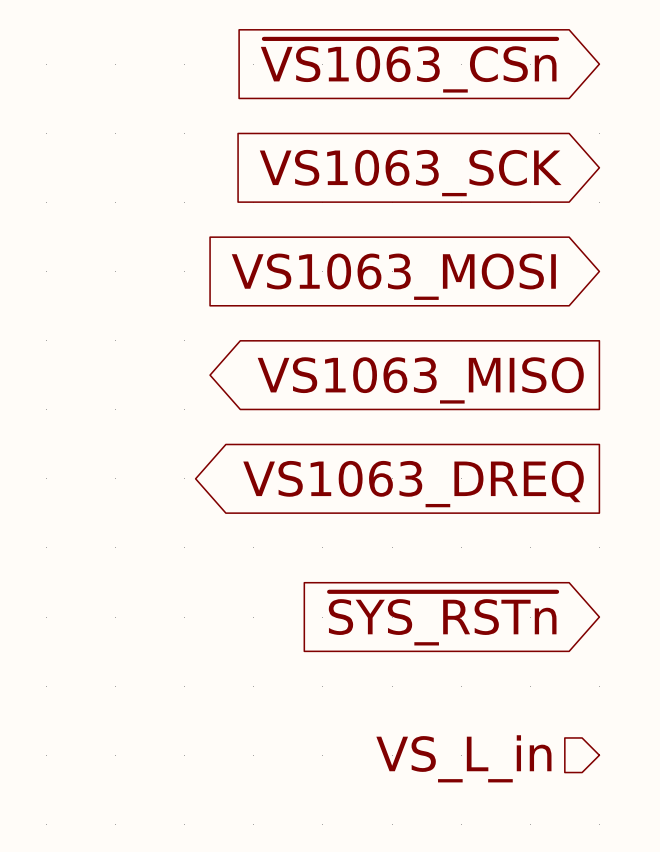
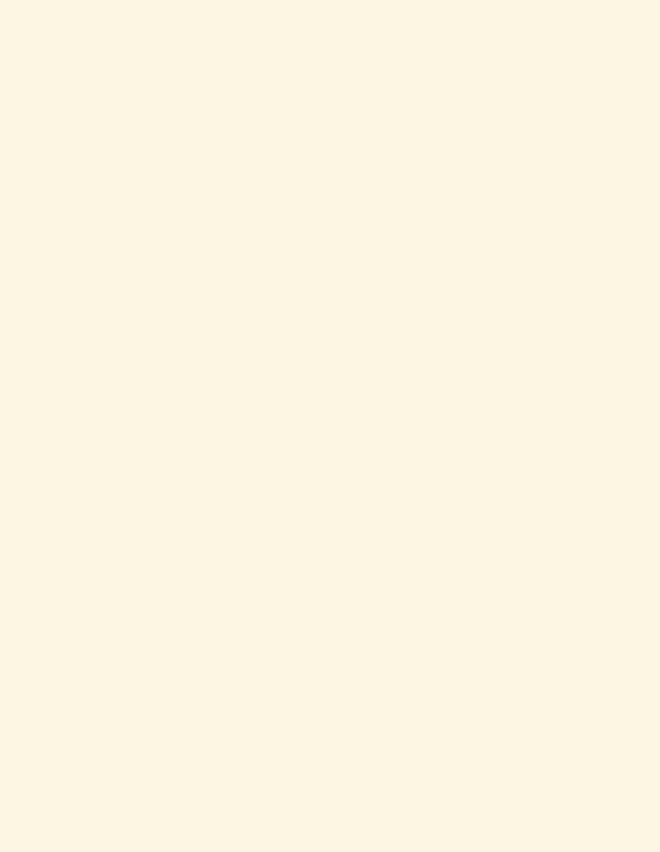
global label: ~{VS1063_CSn} (408, 65) -> none
global label: VS1063_SCK (410, 173) -> none
global label: VS1063_MOSI (393, 276) -> none
global label: VS1063_MISO (420, 380) -> none
global label: VS1063_DREQ (413, 484) -> none
global label: ~{SYS_RSTn} (442, 618) -> none
hierarchical label: VS_L_in (463, 758) -> none

